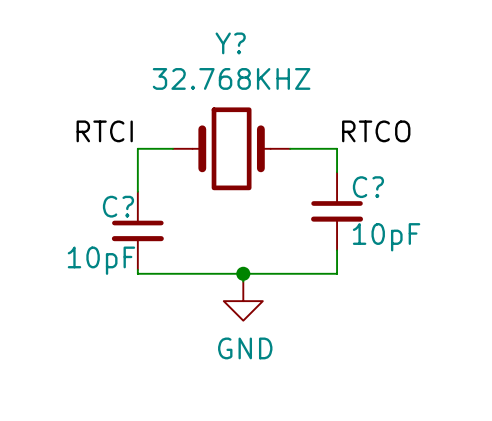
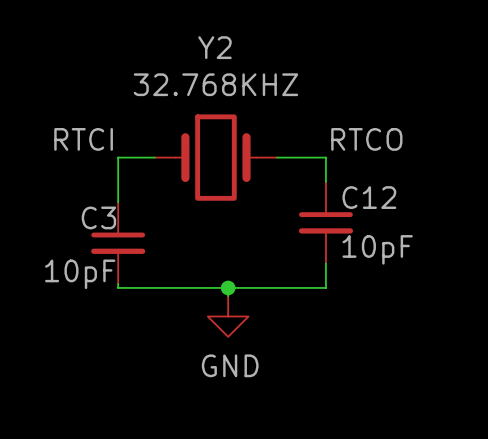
Y? name: Y? (230, 43) -> Y2 (214, 47)
C? name: C? (368, 187) -> C12 (369, 197)
C? name: C? (118, 206) -> C3 (98, 217)

